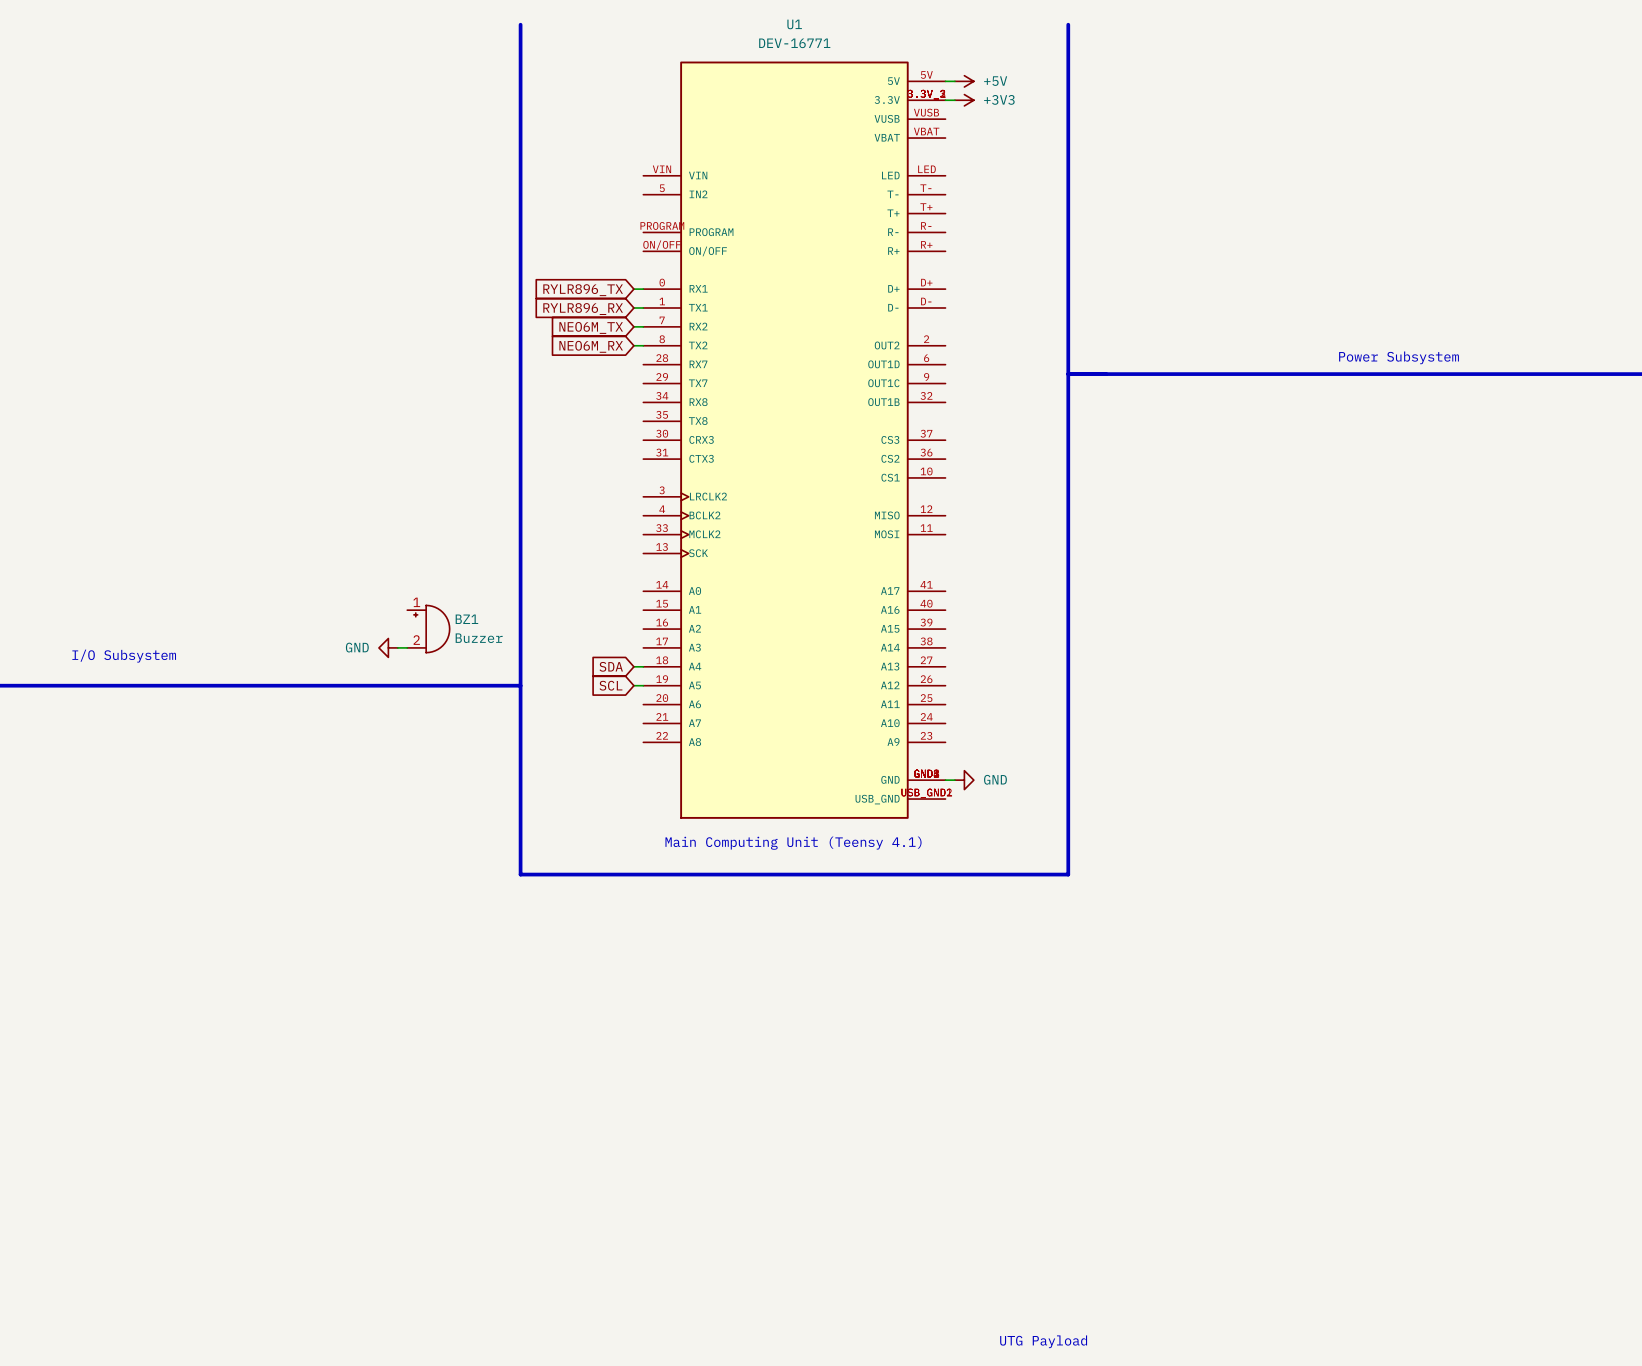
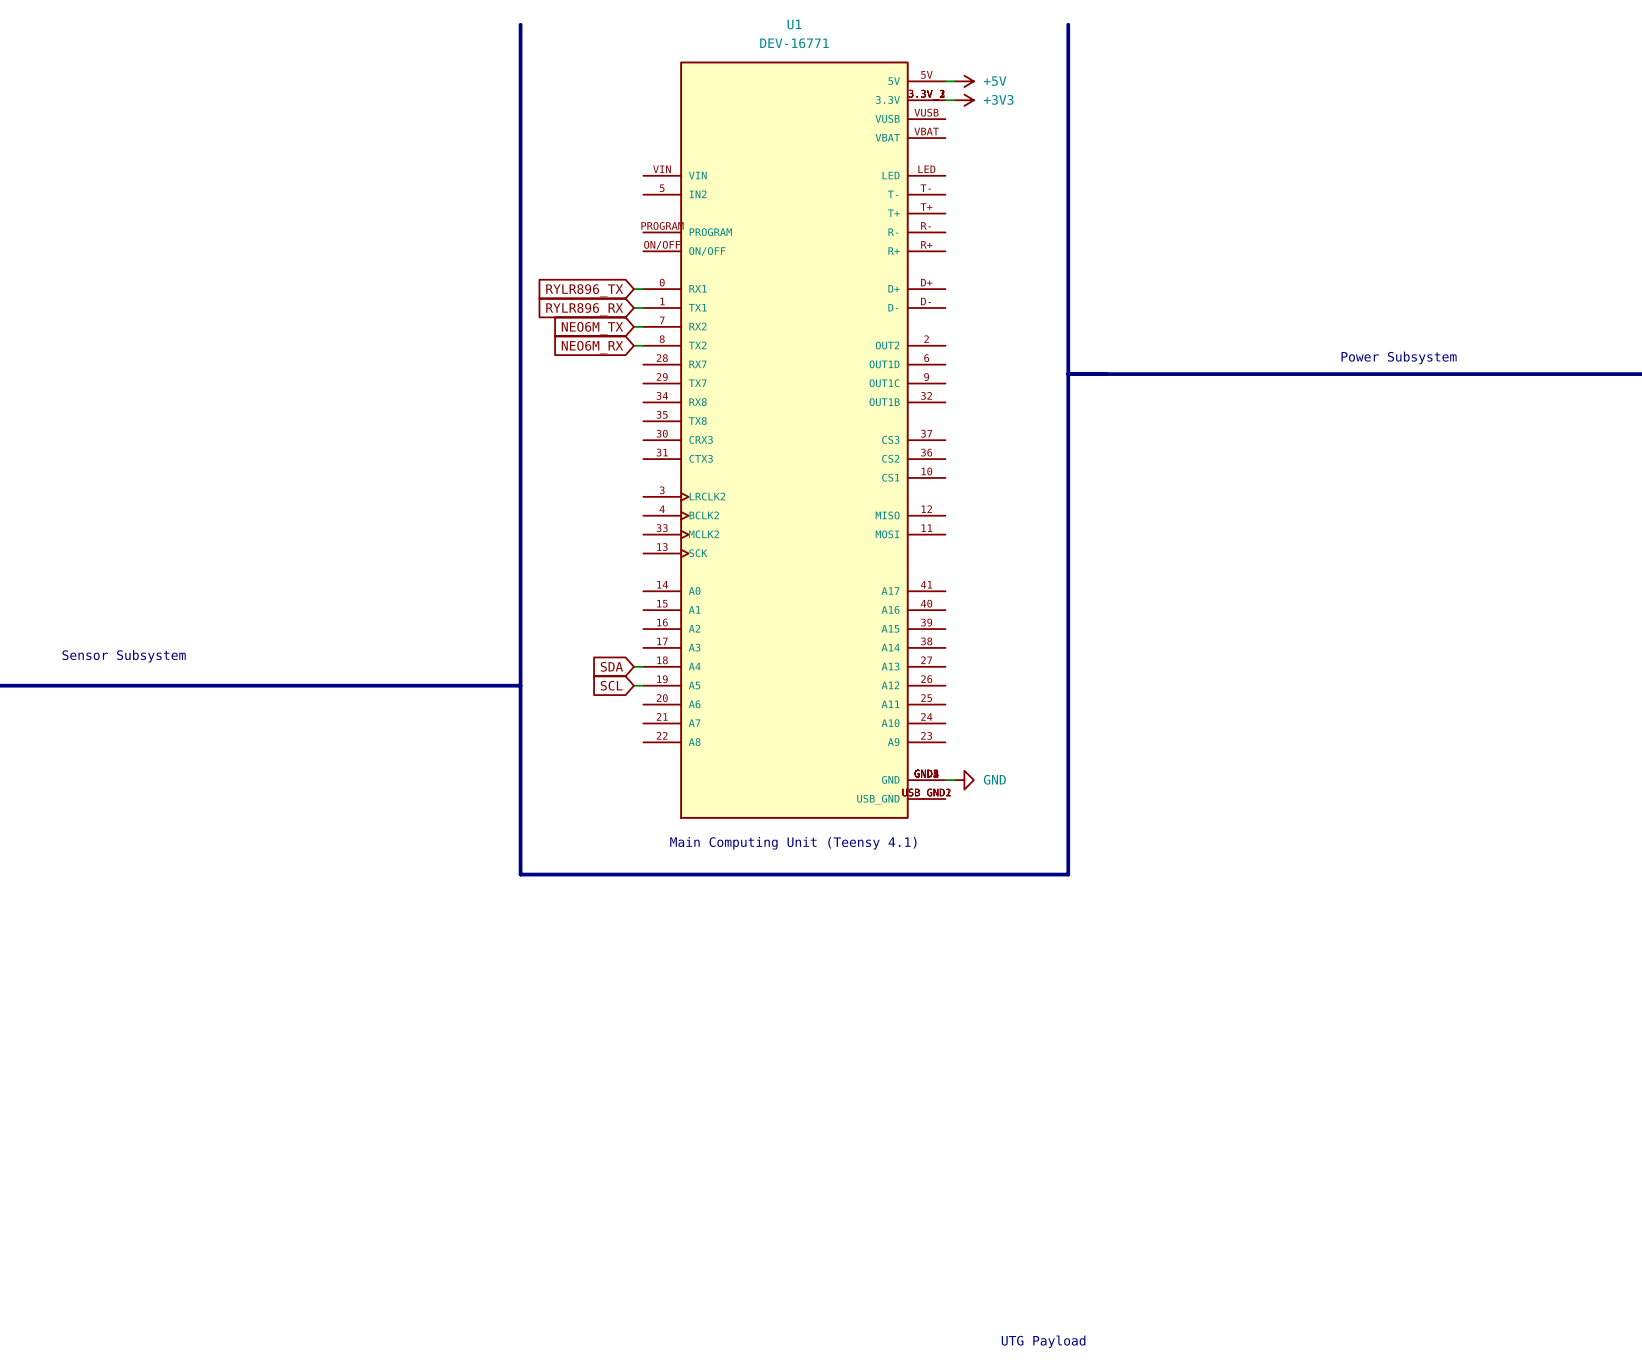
BZ1: Buzzer (428, 629) -> none
power symbol: GND (388, 647) -> none
wire: (397, 647) (407, 647) -> none
text: I/O Subsystem (124, 656) -> Sensor Subsystem (124, 656)

